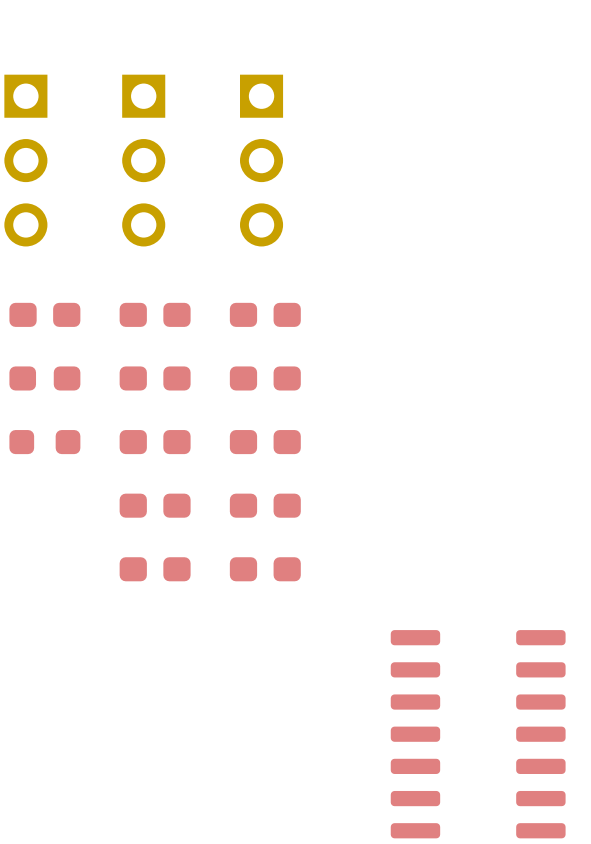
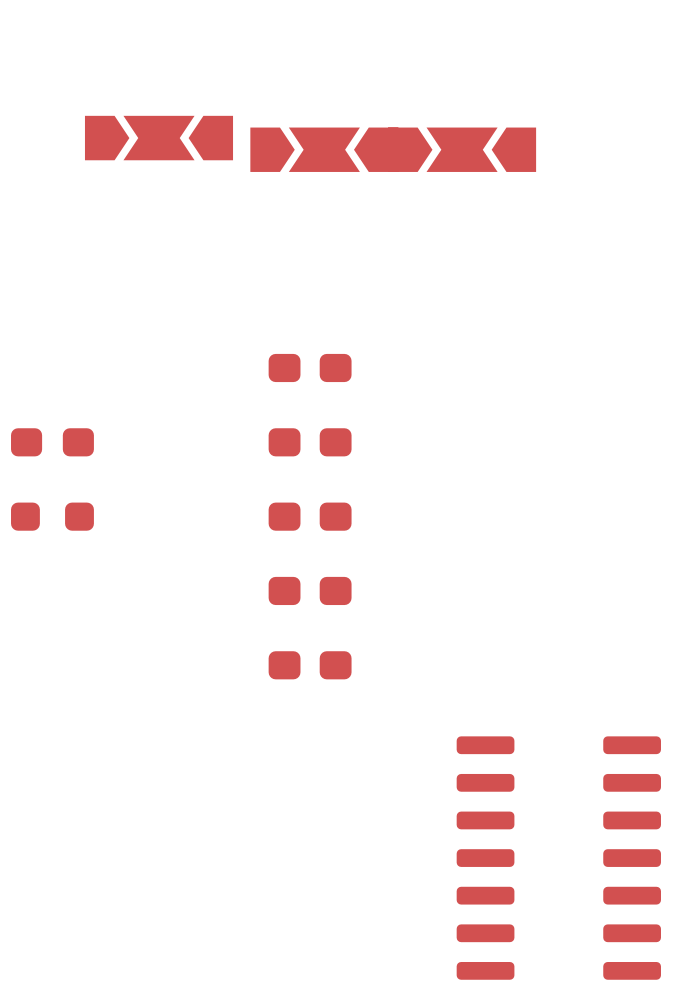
part: none -> (159, 138)
part: none -> (324, 149)
part: none -> (462, 149)
part: (25, 160) -> none
part: (143, 160) -> none
part: (261, 160) -> none
part: (44, 314) -> none
part: (155, 314) -> none
part: (155, 378) -> none
part: (155, 442) -> none
part: (155, 505) -> none
part: (155, 569) -> none

